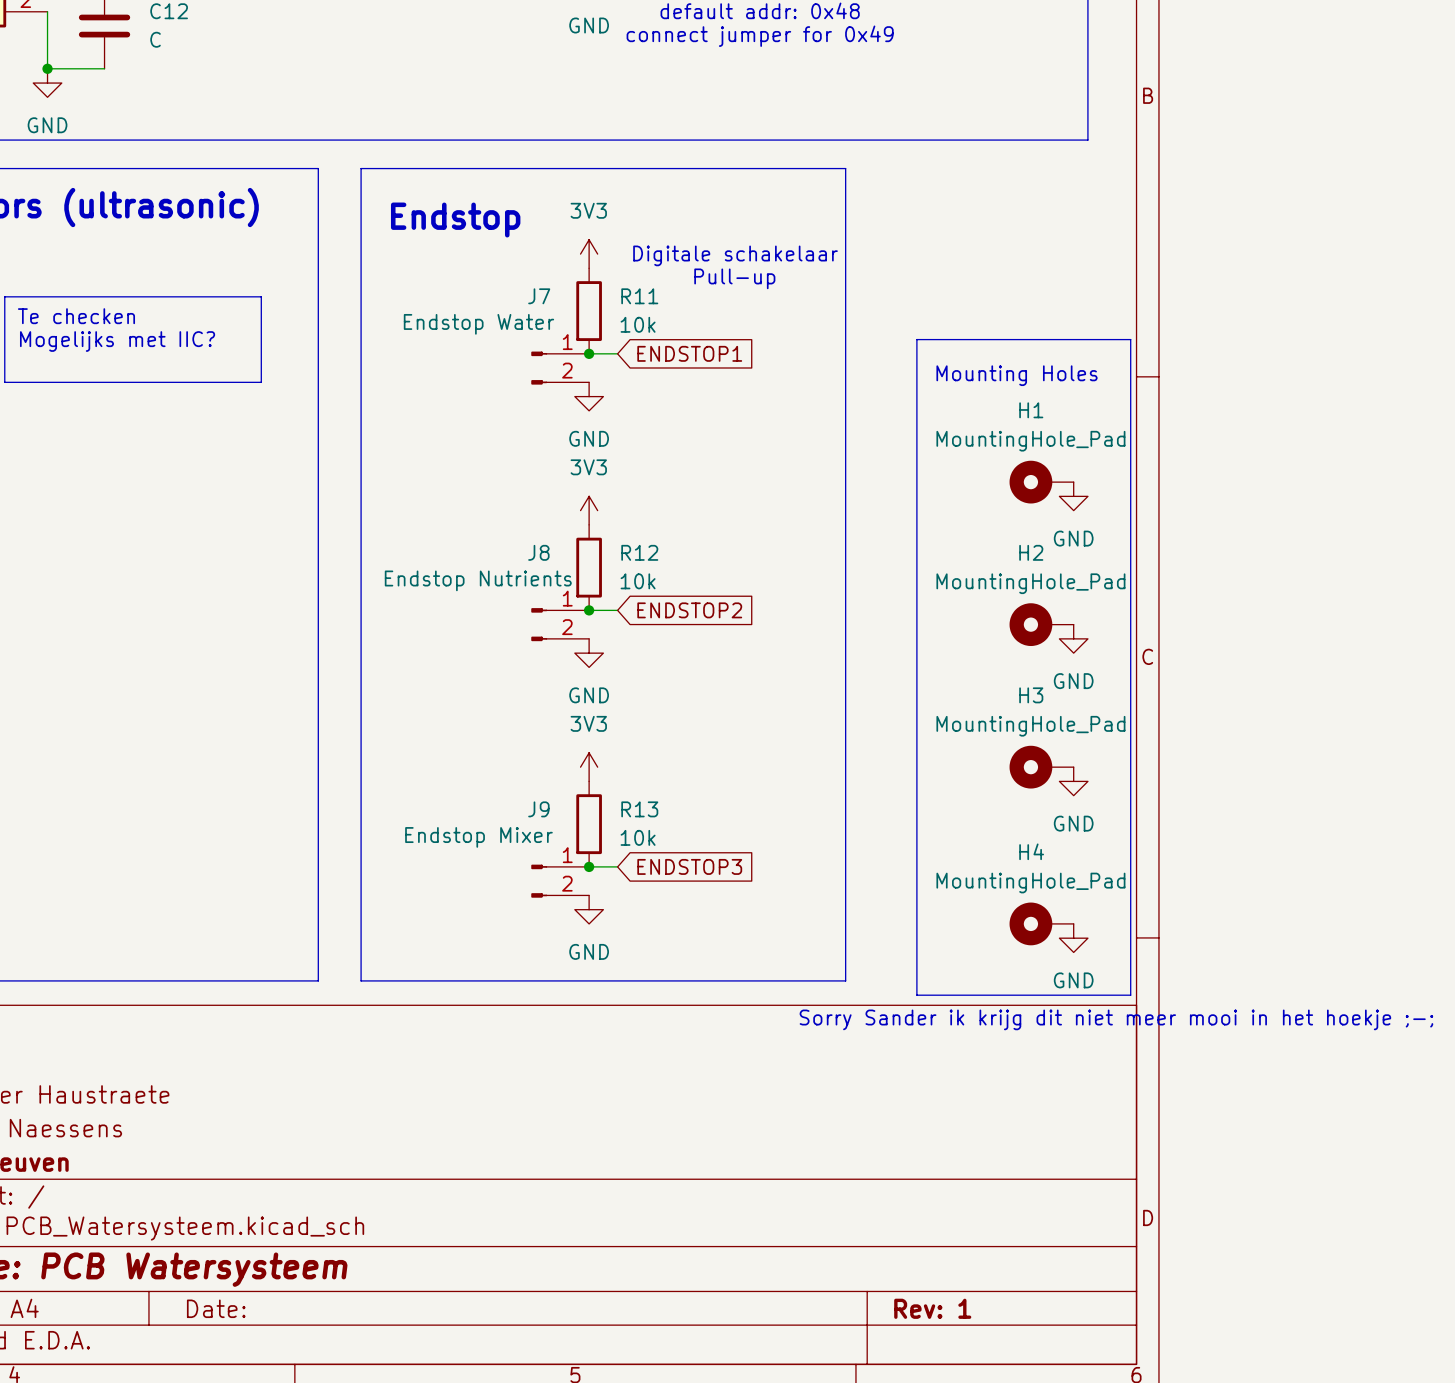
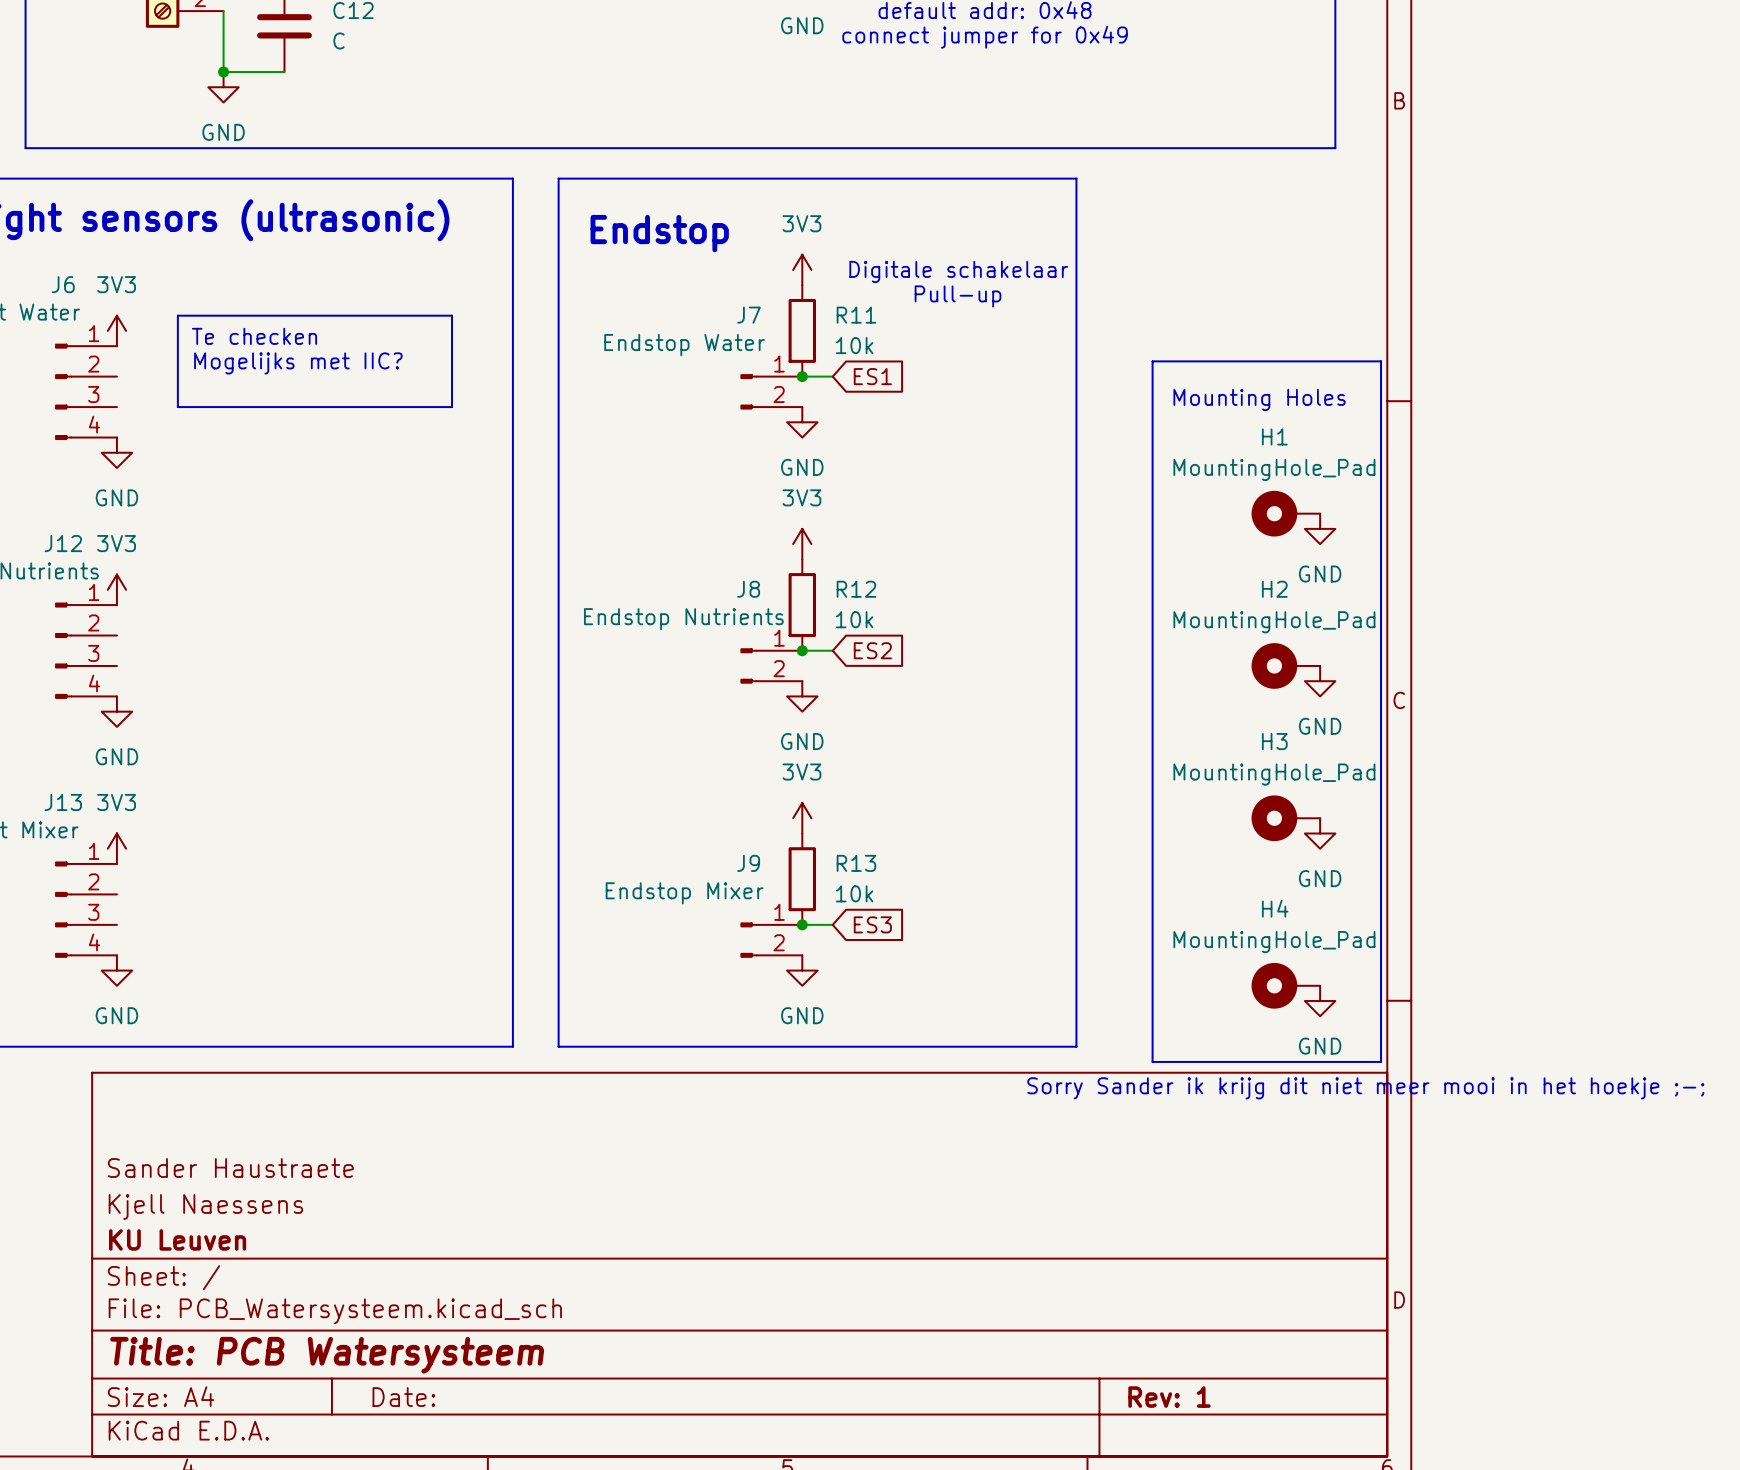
global label: ENDSTOP1 (689, 353) -> ES1 (872, 376)
global label: ENDSTOP2 (689, 610) -> ES2 (872, 650)
global label: ENDSTOP3 (689, 866) -> ES3 (872, 924)

